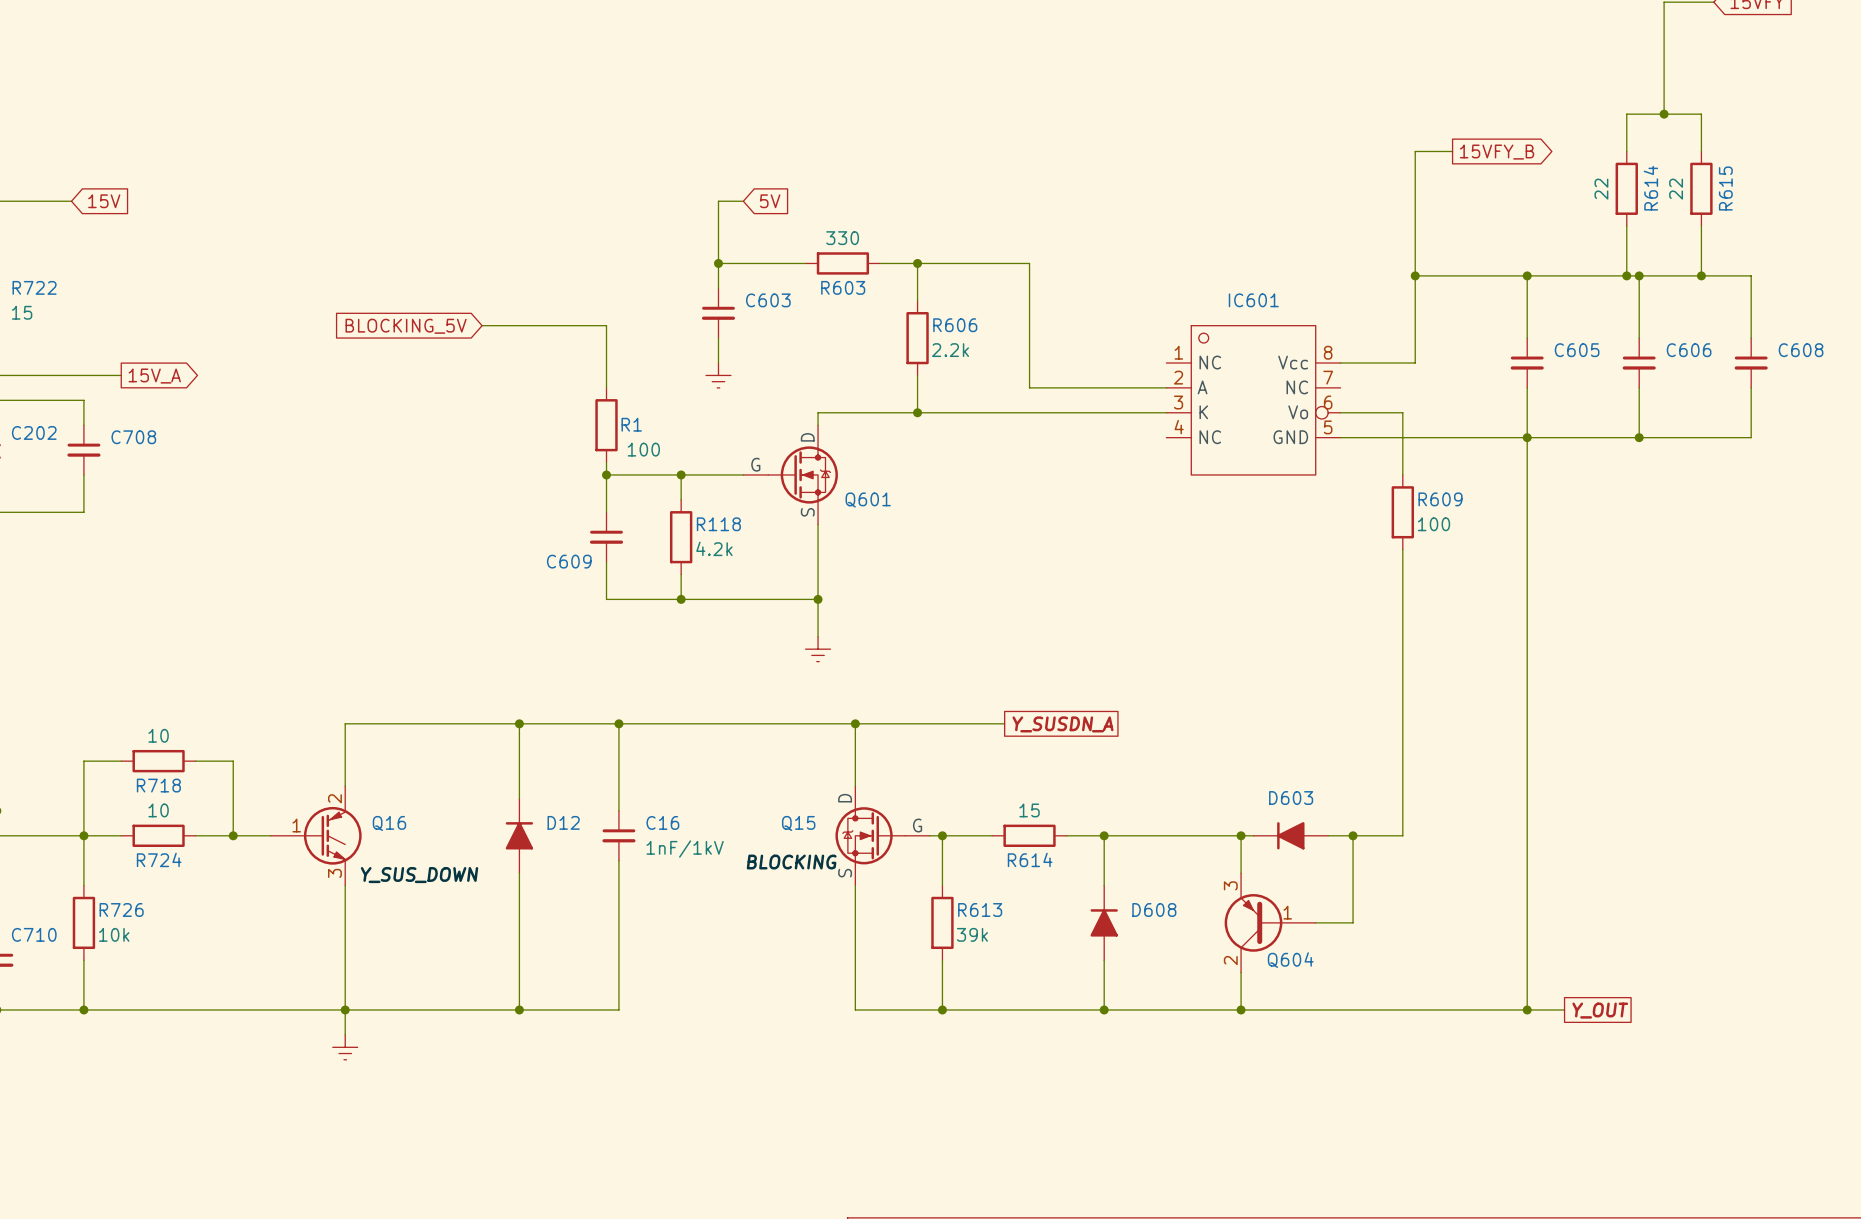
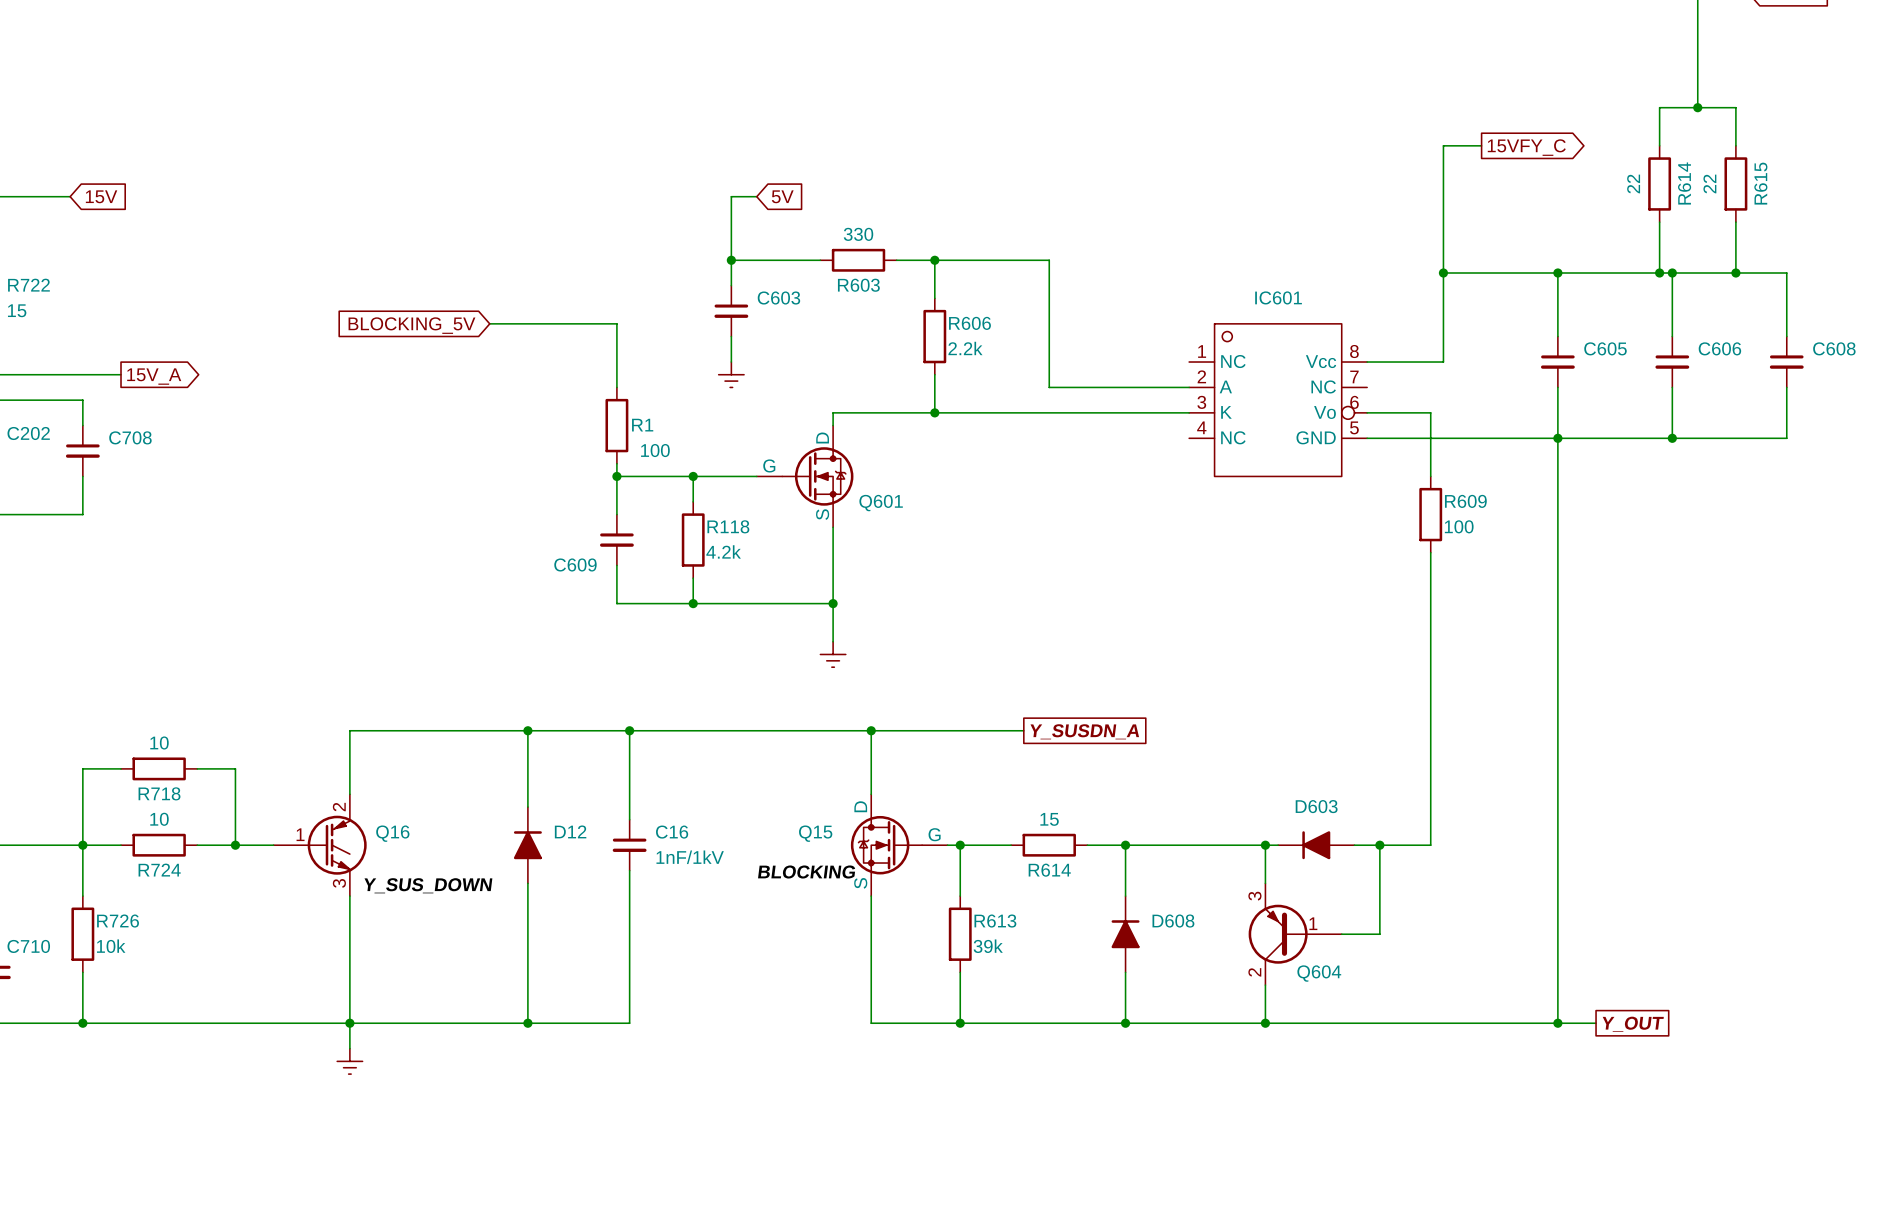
global label: 15VFY_B (1497, 152) -> 15VFY_C (1526, 147)

